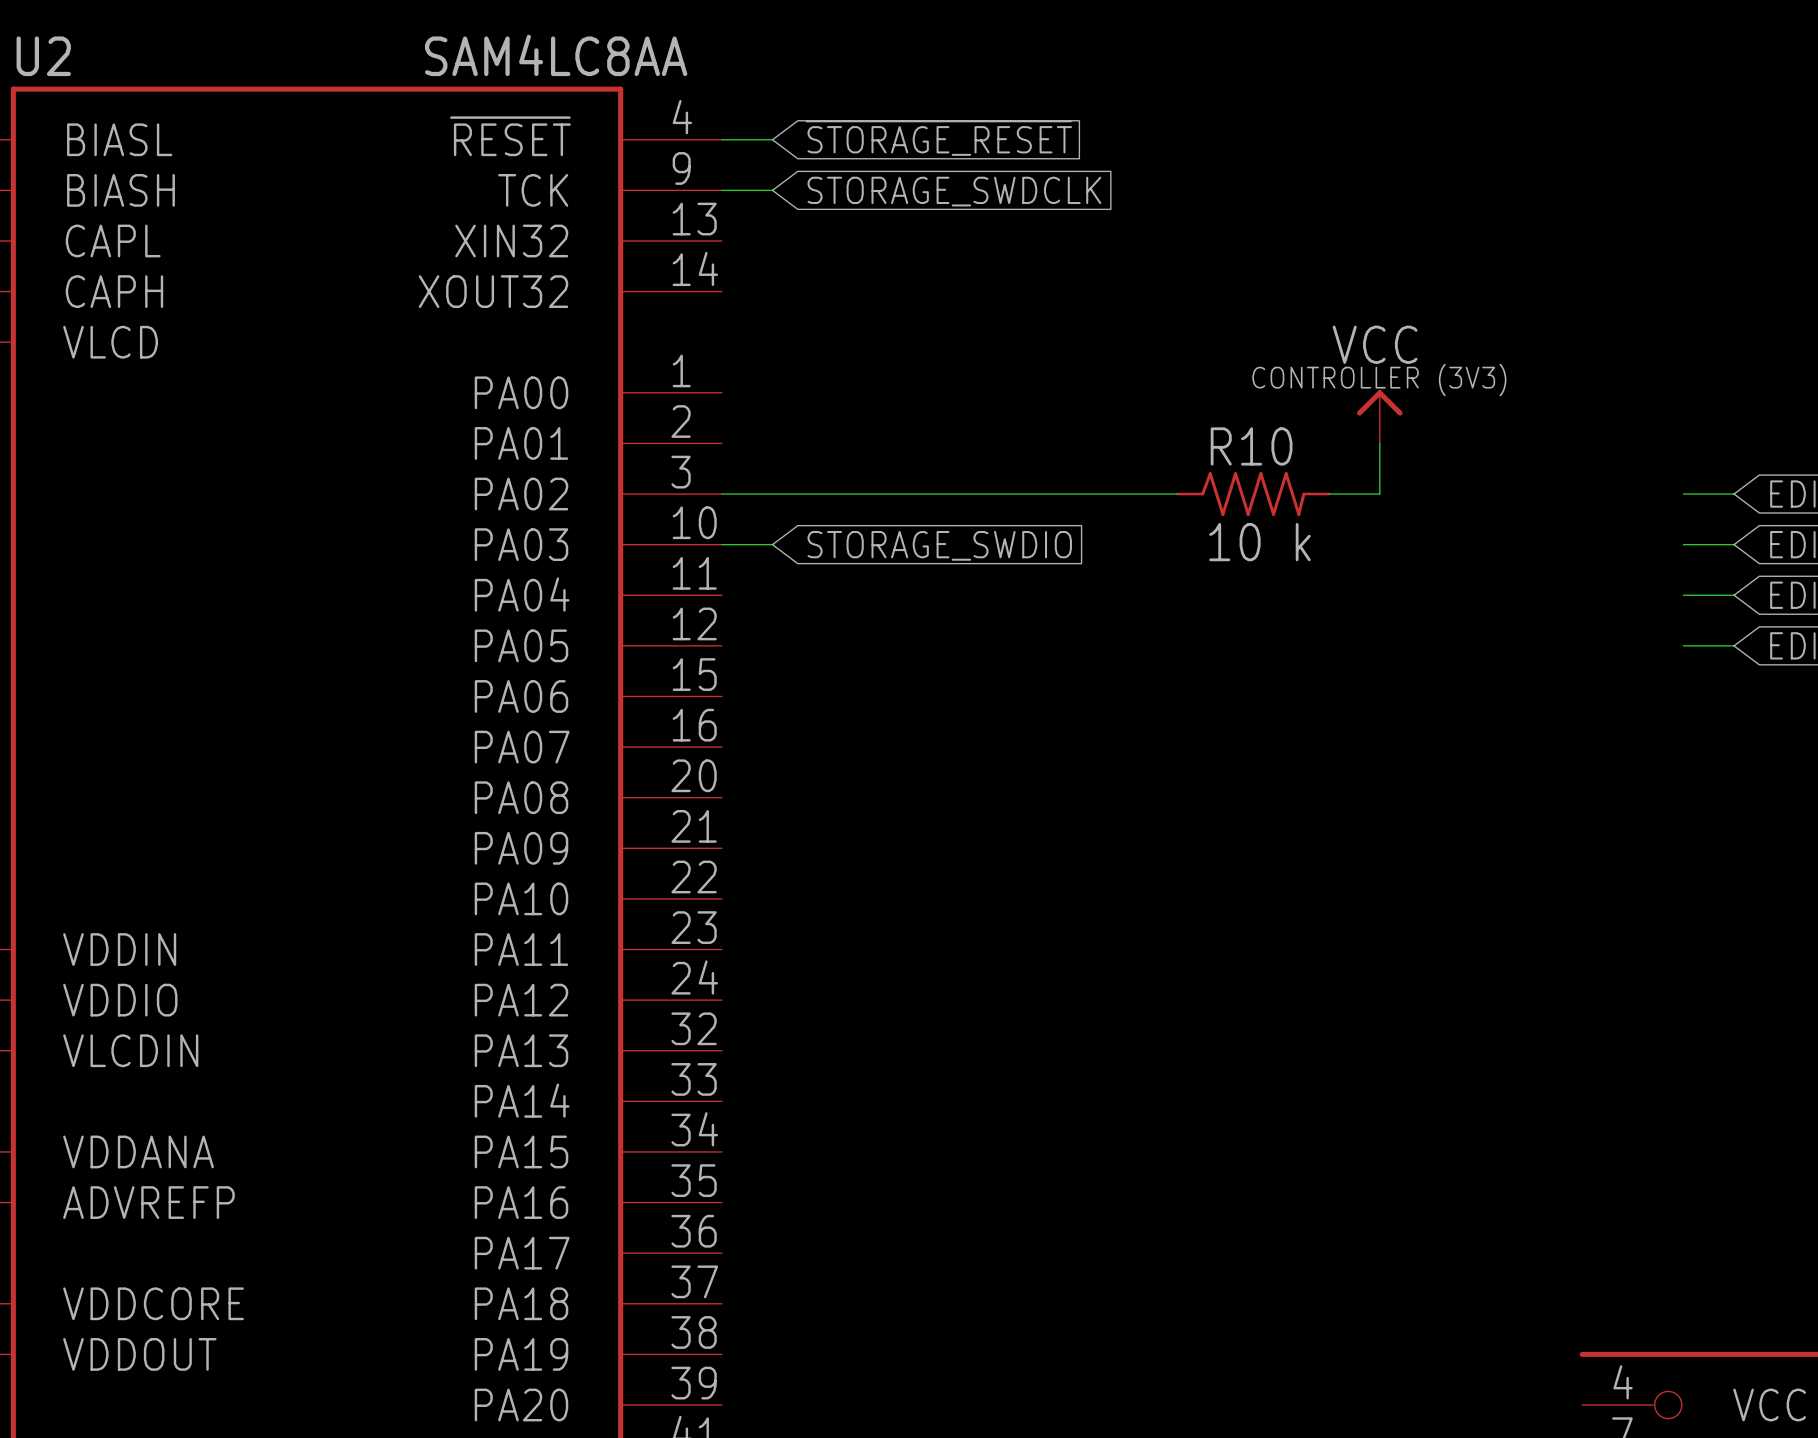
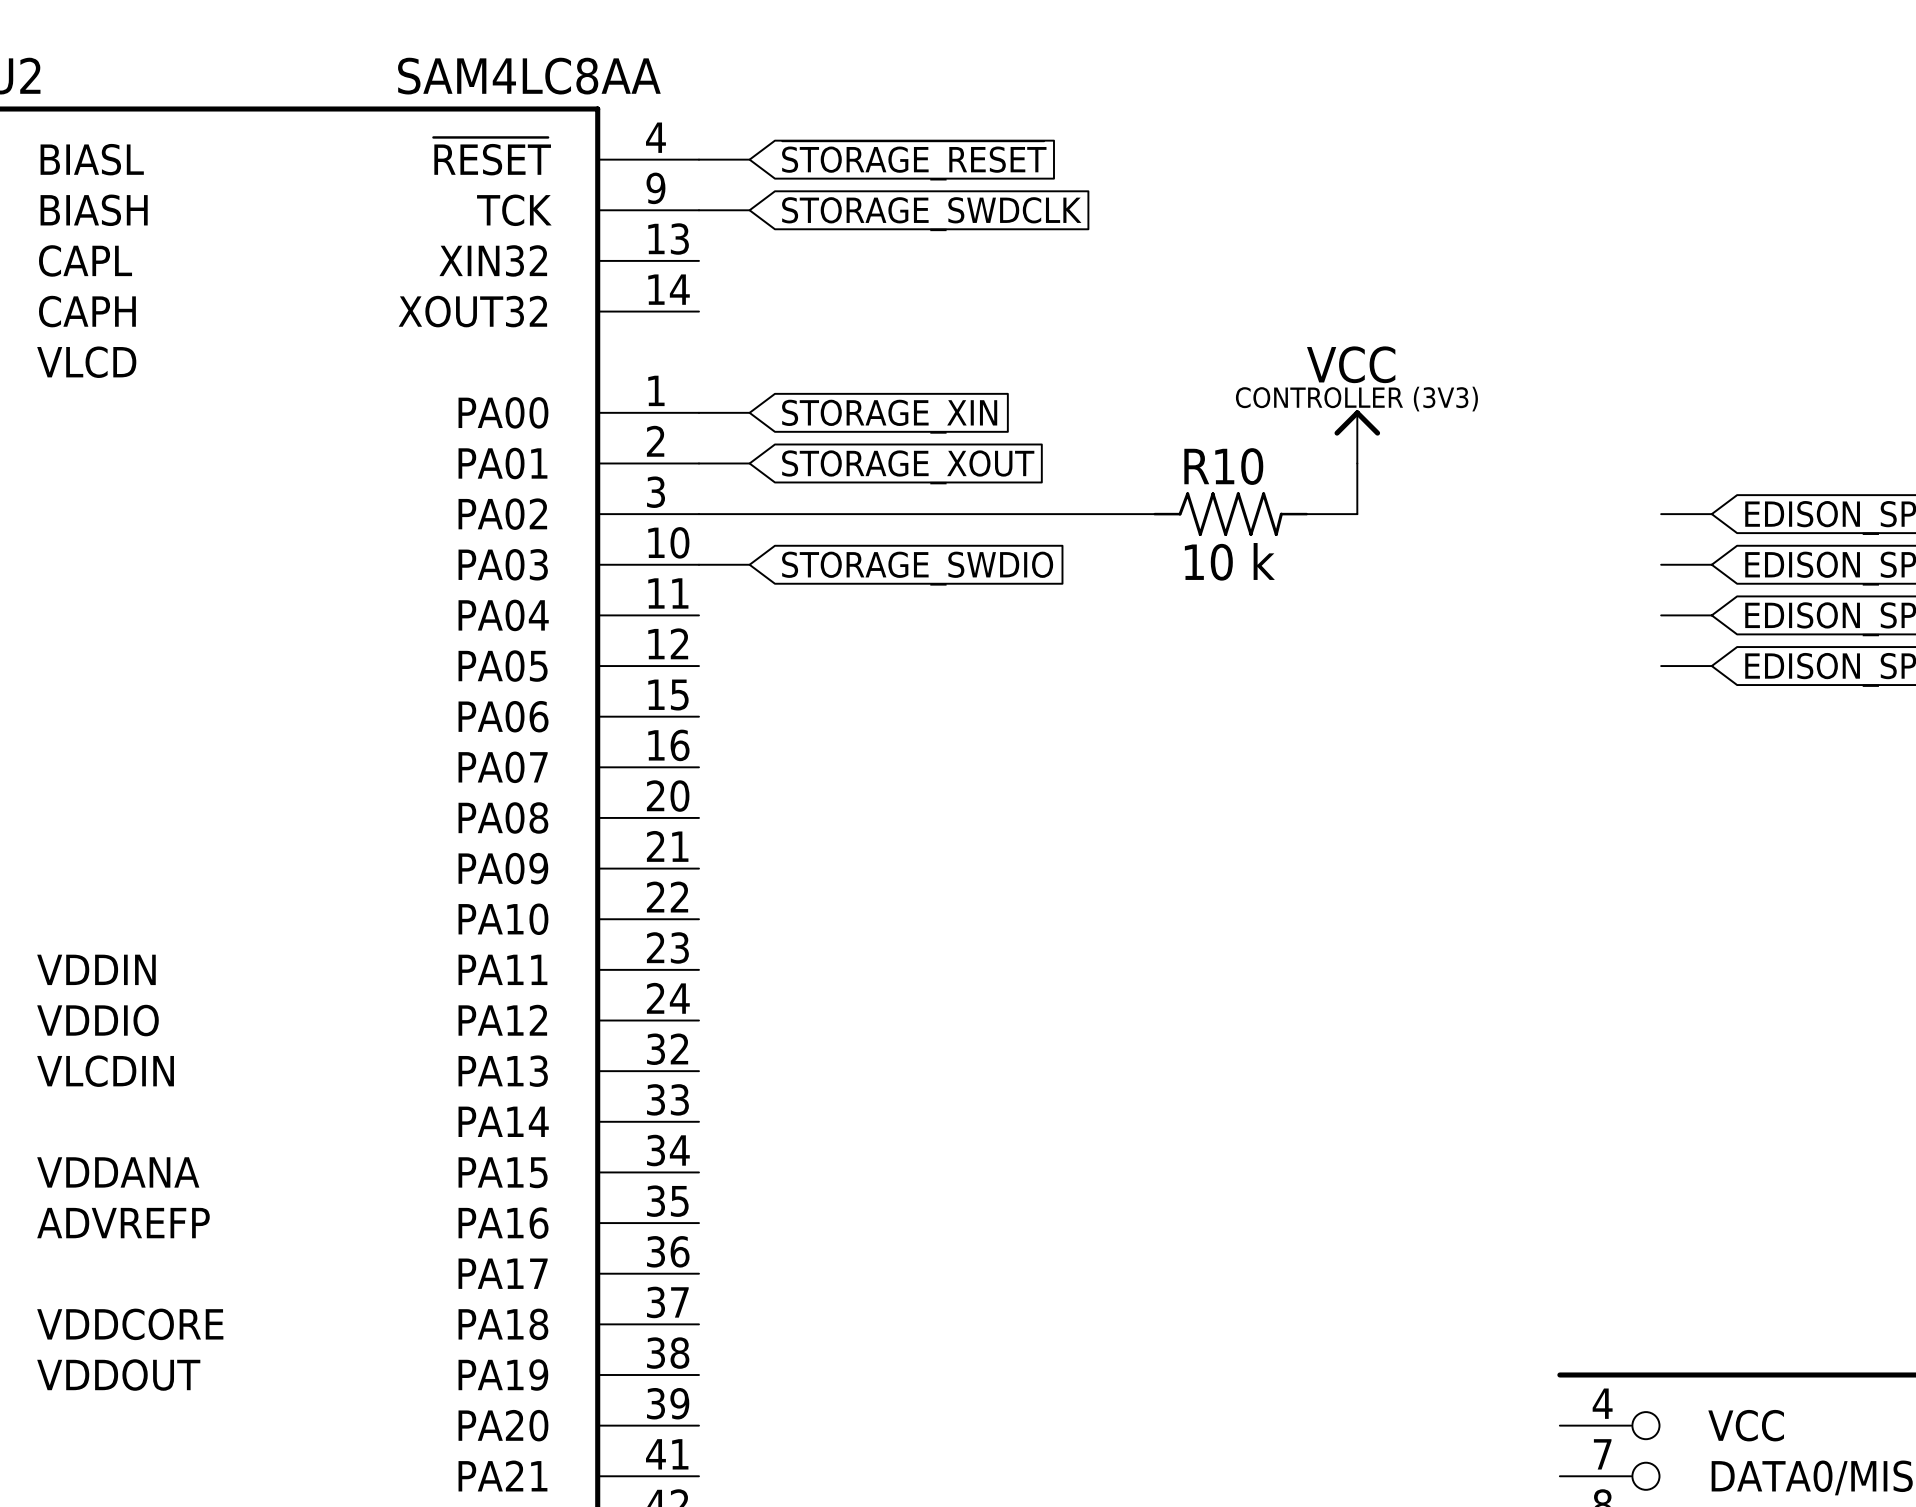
wire: none -> (698, 412) (749, 412)
global label: none -> STORAGE_XIN (889, 416)
wire: none -> (698, 463) (749, 463)
global label: none -> STORAGE_XOUT (908, 467)

